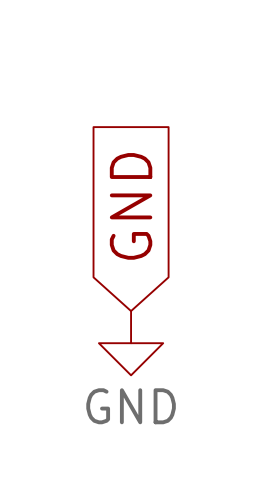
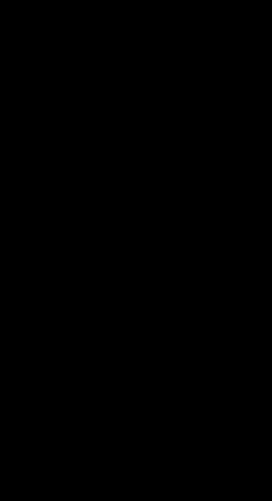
global label: GND (131, 206) -> none
power symbol: GND (131, 343) -> none

